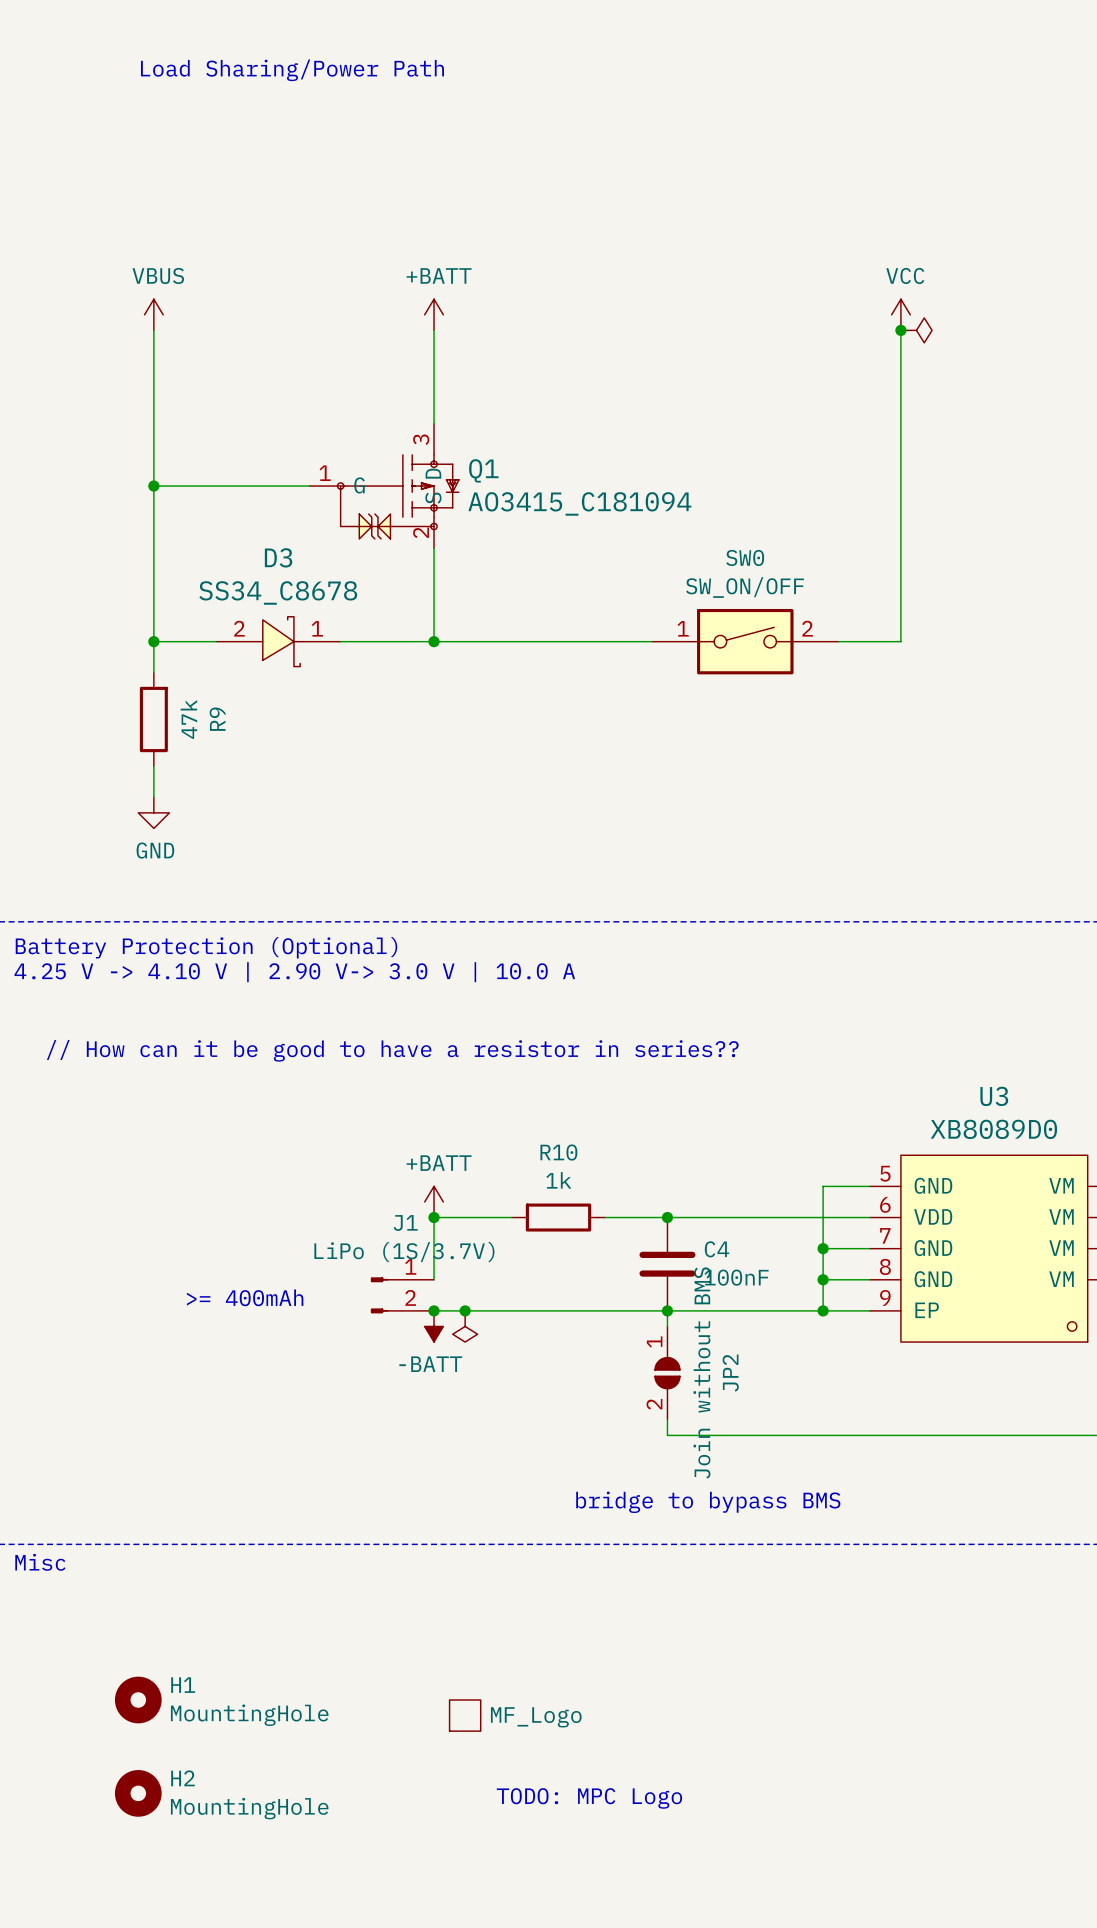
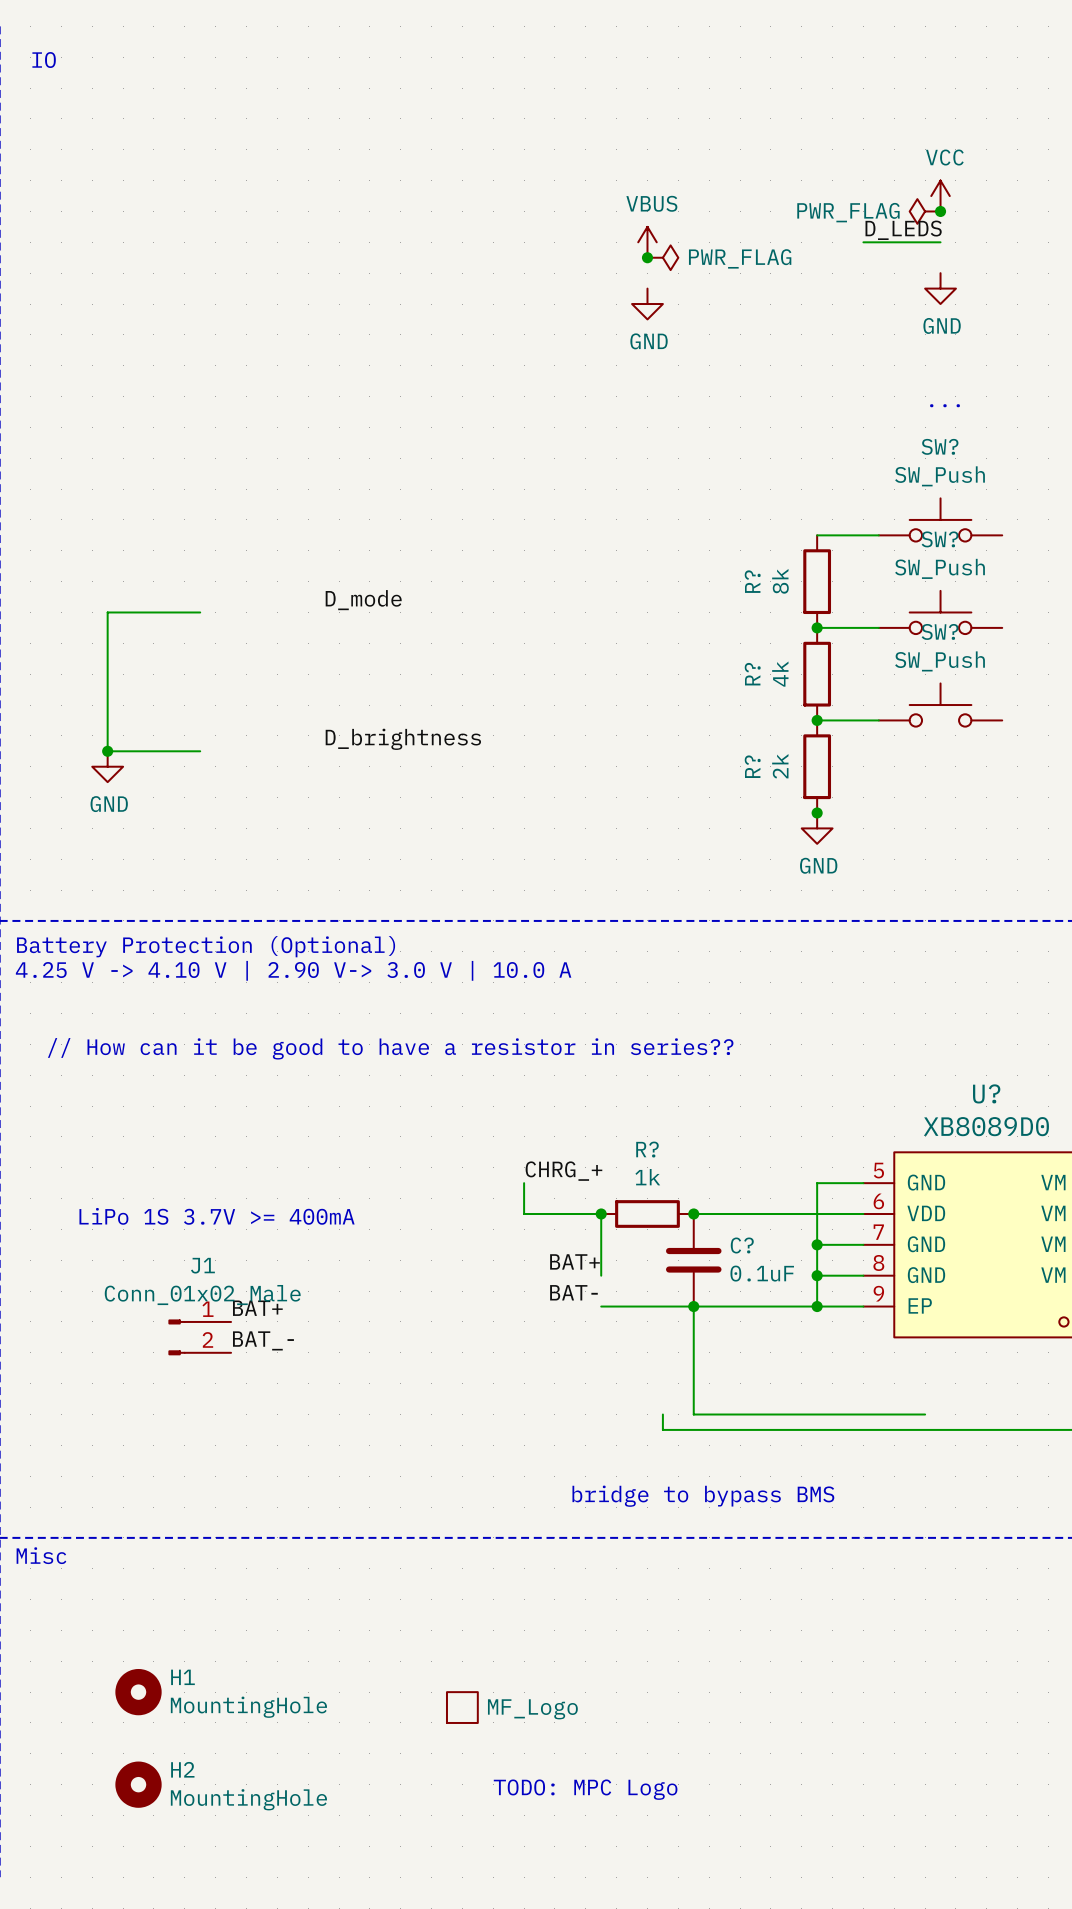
text: none -> IO (44, 60)
text: Load Sharing/Power Path (292, 70) -> none
power symbol: none -> PWR_FLAG (925, 211)
junction: none -> (940, 211)
label: none -> D_LEDS (903, 230)
power symbol: none -> VBUS (647, 242)
wire: none -> (863, 242) (940, 242)
junction: none -> (647, 257)
power symbol: none -> PWR_FLAG (662, 257)
power symbol: none -> GND (940, 288)
power symbol: none -> GND (647, 304)
power symbol: VBUS (153, 314) -> none
power symbol: +BATT (434, 314) -> none
power symbol position: VCC (900, 314) -> VCC (940, 196)
wire: (153, 330) (153, 672) -> none
wire: (434, 330) (434, 423) -> none
wire: (900, 330) (900, 641) (838, 641) -> none
junction: (900, 330) -> none
power symbol: (916, 330) -> none
text: none -> ... (945, 405)
wire: (153, 486) (309, 486) -> none
junction: (153, 486) -> none
Q1: AO3415_C181094 (384, 486) -> none
SW?: none -> SW_Push (940, 519)
wire: none -> (817, 535) (878, 535)
wire: (434, 548) (434, 641) -> none
R?: none -> 8k (817, 581)
label: none -> D_mode (363, 600)
wire: none -> (200, 612) (107, 612) (107, 751) (200, 751)
SW?: none -> SW_Push (940, 612)
wire: none -> (817, 627) (878, 627)
junction: none -> (817, 627)
wire: (153, 641) (216, 641) -> none
junction: (153, 641) -> none
D3: SS34_C8678 (278, 641) -> none
wire: (340, 641) (651, 641) -> none
junction: (434, 641) -> none
SW0: SW_ON/OFF (745, 641) -> none
R?: none -> 4k (817, 674)
SW?: none -> SW_Push (940, 705)
R9: 47k (153, 719) -> none
wire: none -> (817, 720) (878, 720)
junction: none -> (817, 720)
label: none -> D_brightness (403, 739)
junction: none -> (107, 751)
wire: (153, 766) (153, 797) -> none
R?: none -> 2k (817, 766)
power symbol position: GND (153, 812) -> GND (107, 766)
junction: none -> (817, 812)
power symbol: none -> GND (817, 828)
U3 name: U3 (994, 1096) -> U? (986, 1093)
label: none -> CHRG_+ (563, 1171)
wire: none -> (524, 1183) (524, 1214) (601, 1214) (601, 1275)
power symbol: +BATT (434, 1201) -> none
junction: (434, 1217) -> none
wire: (511, 1217) (434, 1217) (434, 1279) -> none
R10: 1k (558, 1217) -> none
wire: (605, 1217) (698, 1217) -> none
junction: none -> (601, 1214)
R?: none -> 1k (647, 1214)
junction: (667, 1217) -> none
junction: none -> (693, 1214)
text: none -> LiPo 1S 3.7V >= 400mA (217, 1216)
J1 value: LiPo (1S/3.7V) (404, 1252) -> Conn_01x02_Male (202, 1295)
C4: 100nF (667, 1264) -> none
C?: none -> 0.1uF (693, 1260)
label: none -> BAT+ (574, 1261)
J1 position: (402, 1295) -> (199, 1337)
text: >= 400mAh (245, 1297) -> none
label: none -> BAT- (573, 1292)
wire: (434, 1310) (605, 1310) -> none
junction: (434, 1310) -> none
junction: (465, 1310) -> none
wire: (667, 1310) (667, 1326) -> none
junction position: (667, 1310) -> (693, 1306)
wire: none -> (693, 1306) (693, 1414) (925, 1414)
label: none -> BAT+ (257, 1308)
power symbol: -BATT (434, 1326) -> none
power symbol: (465, 1326) -> none
label: none -> BAT_- (263, 1340)
JP2: Join without BMS (667, 1373) -> none

